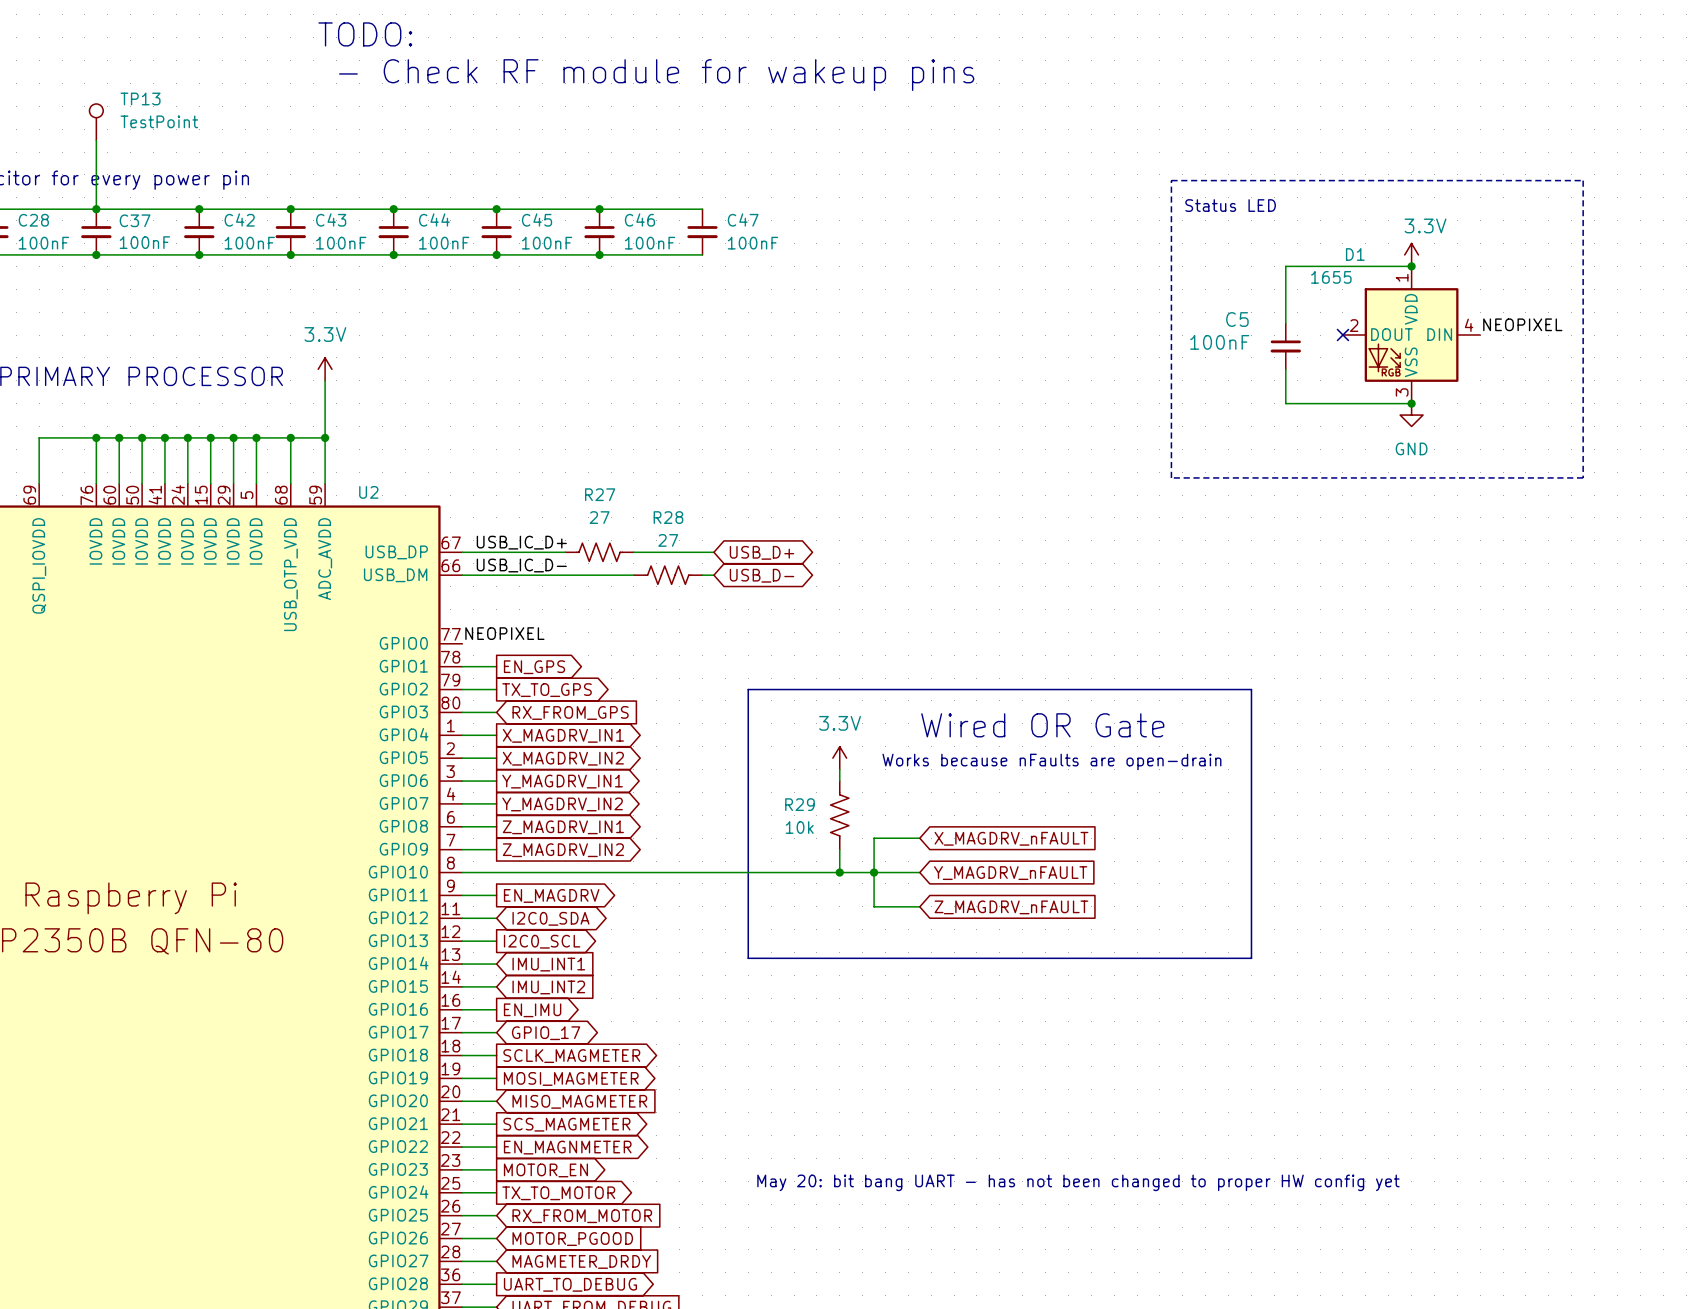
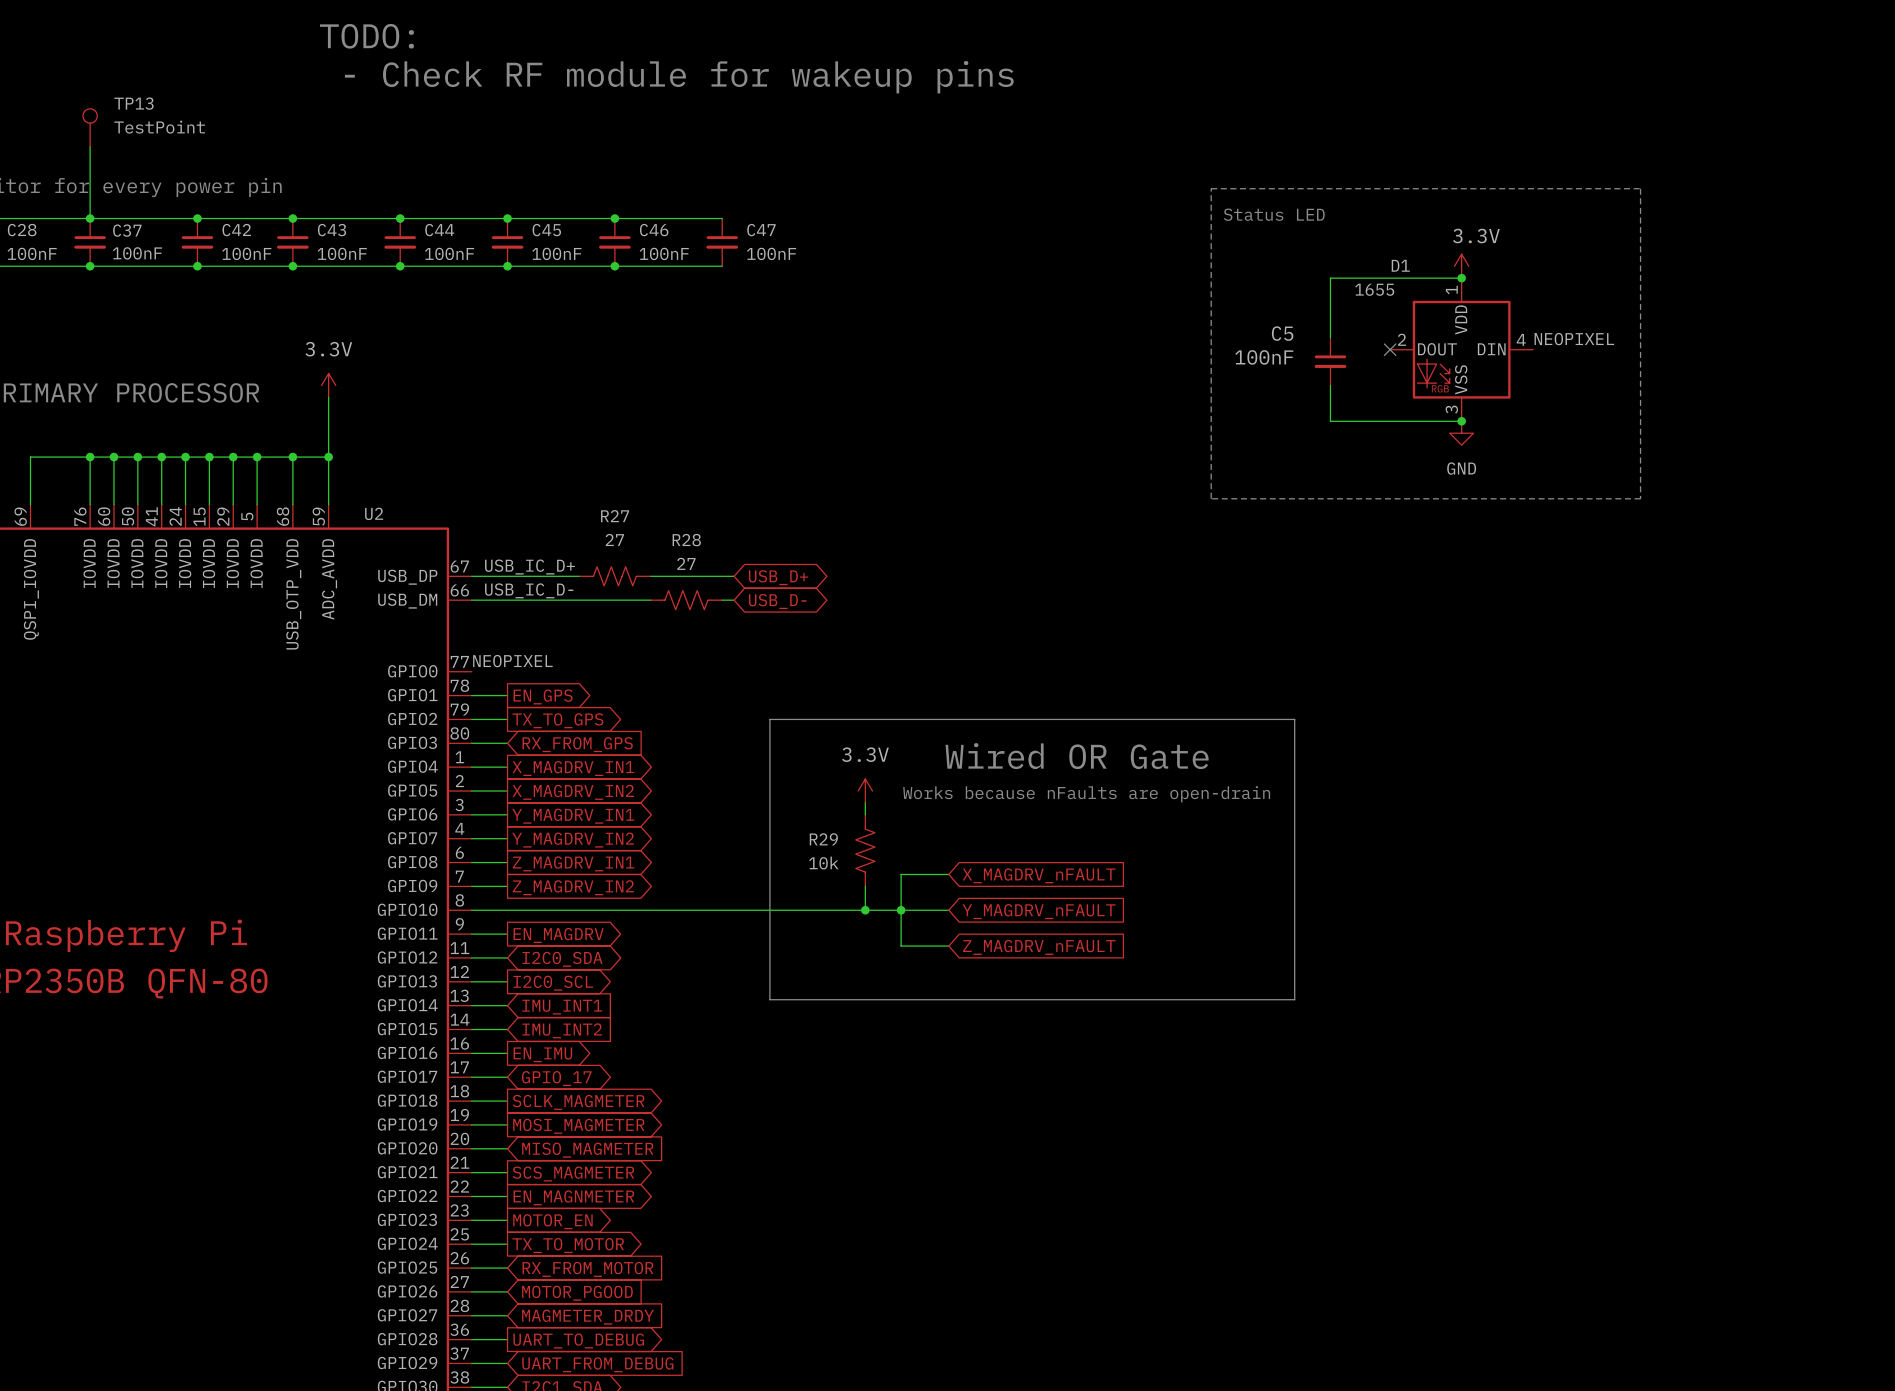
text: May 20: bit bang UART - has not been changed to proper HW config yet (1078, 1182) -> none

